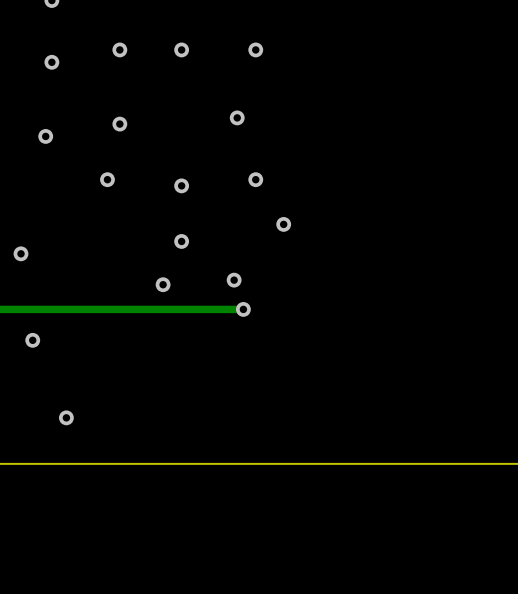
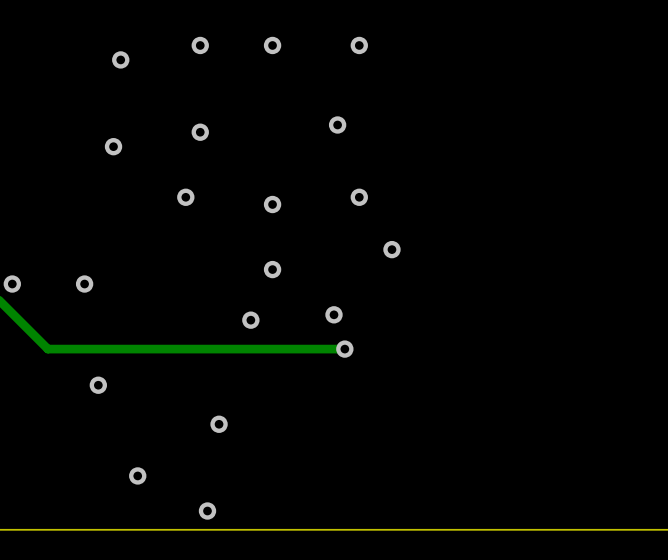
via: none -> (219, 424)
via: none -> (207, 511)

